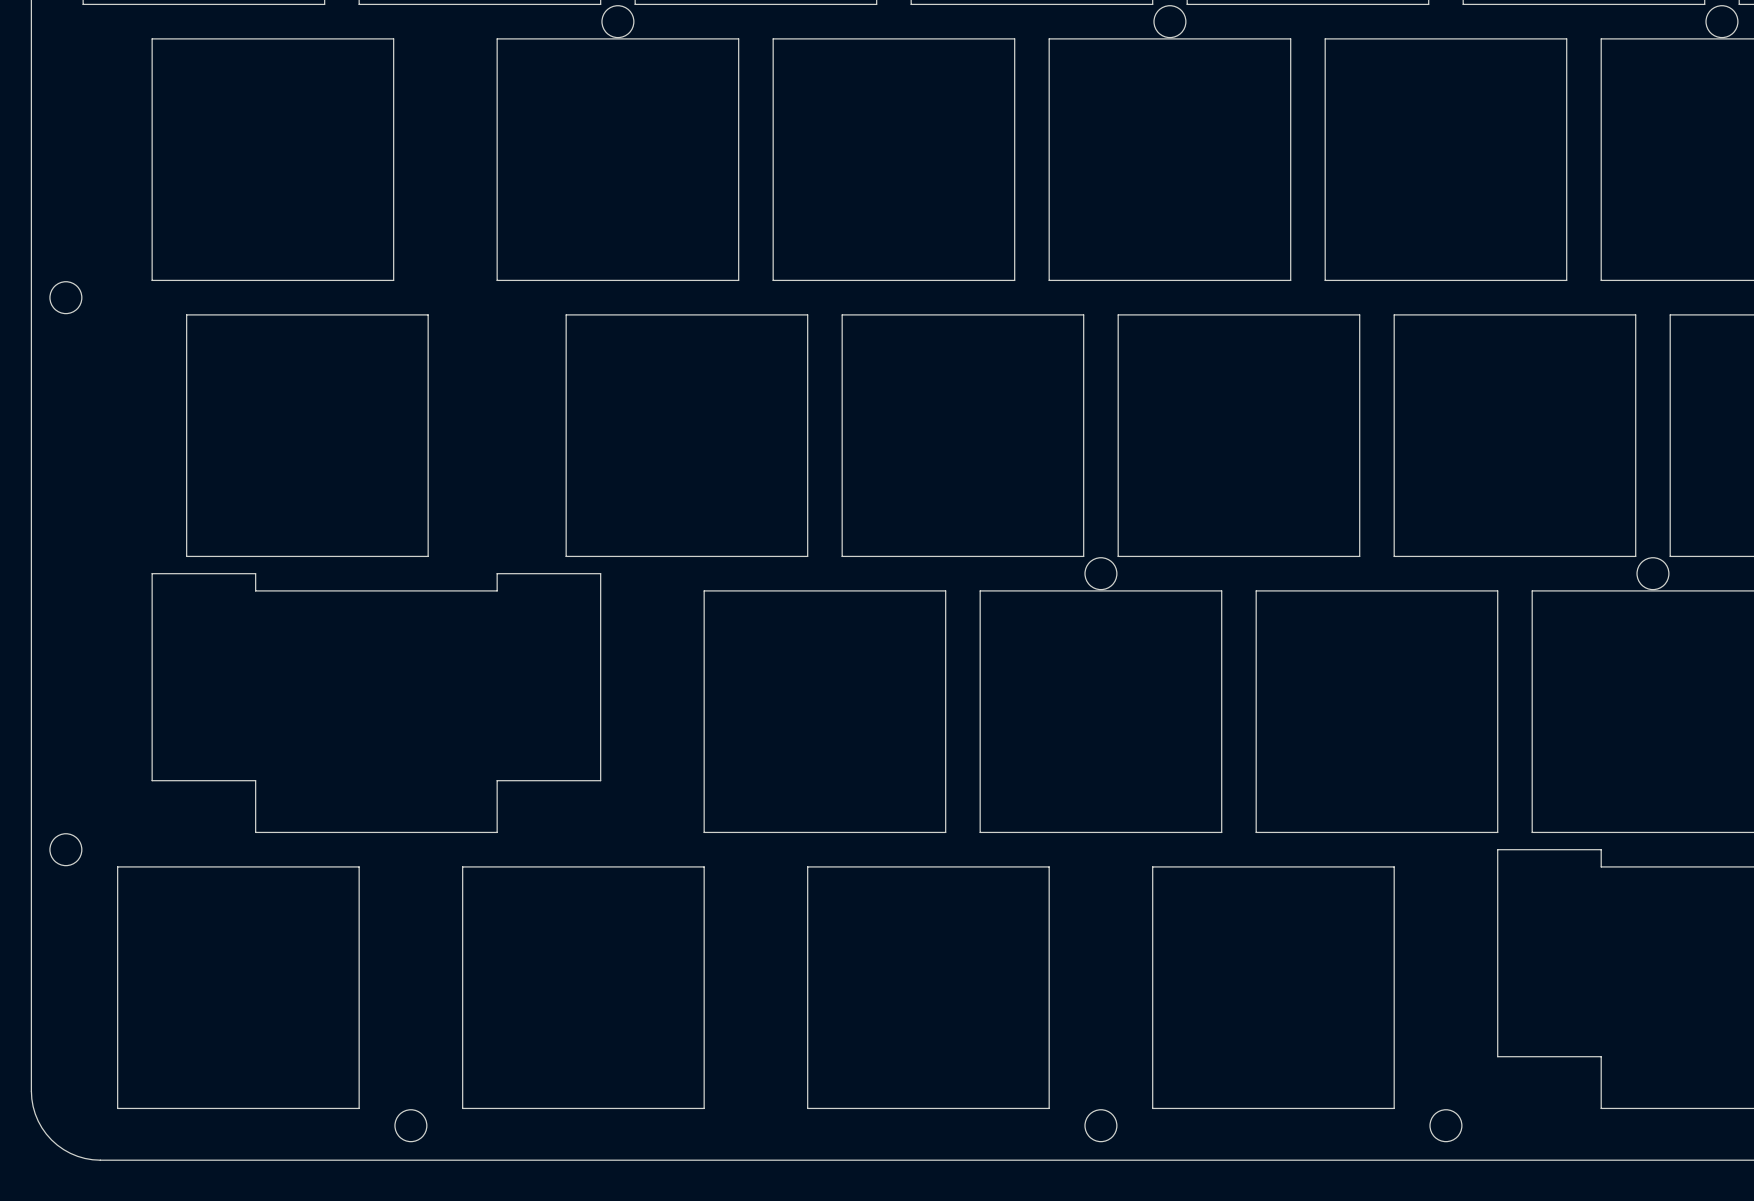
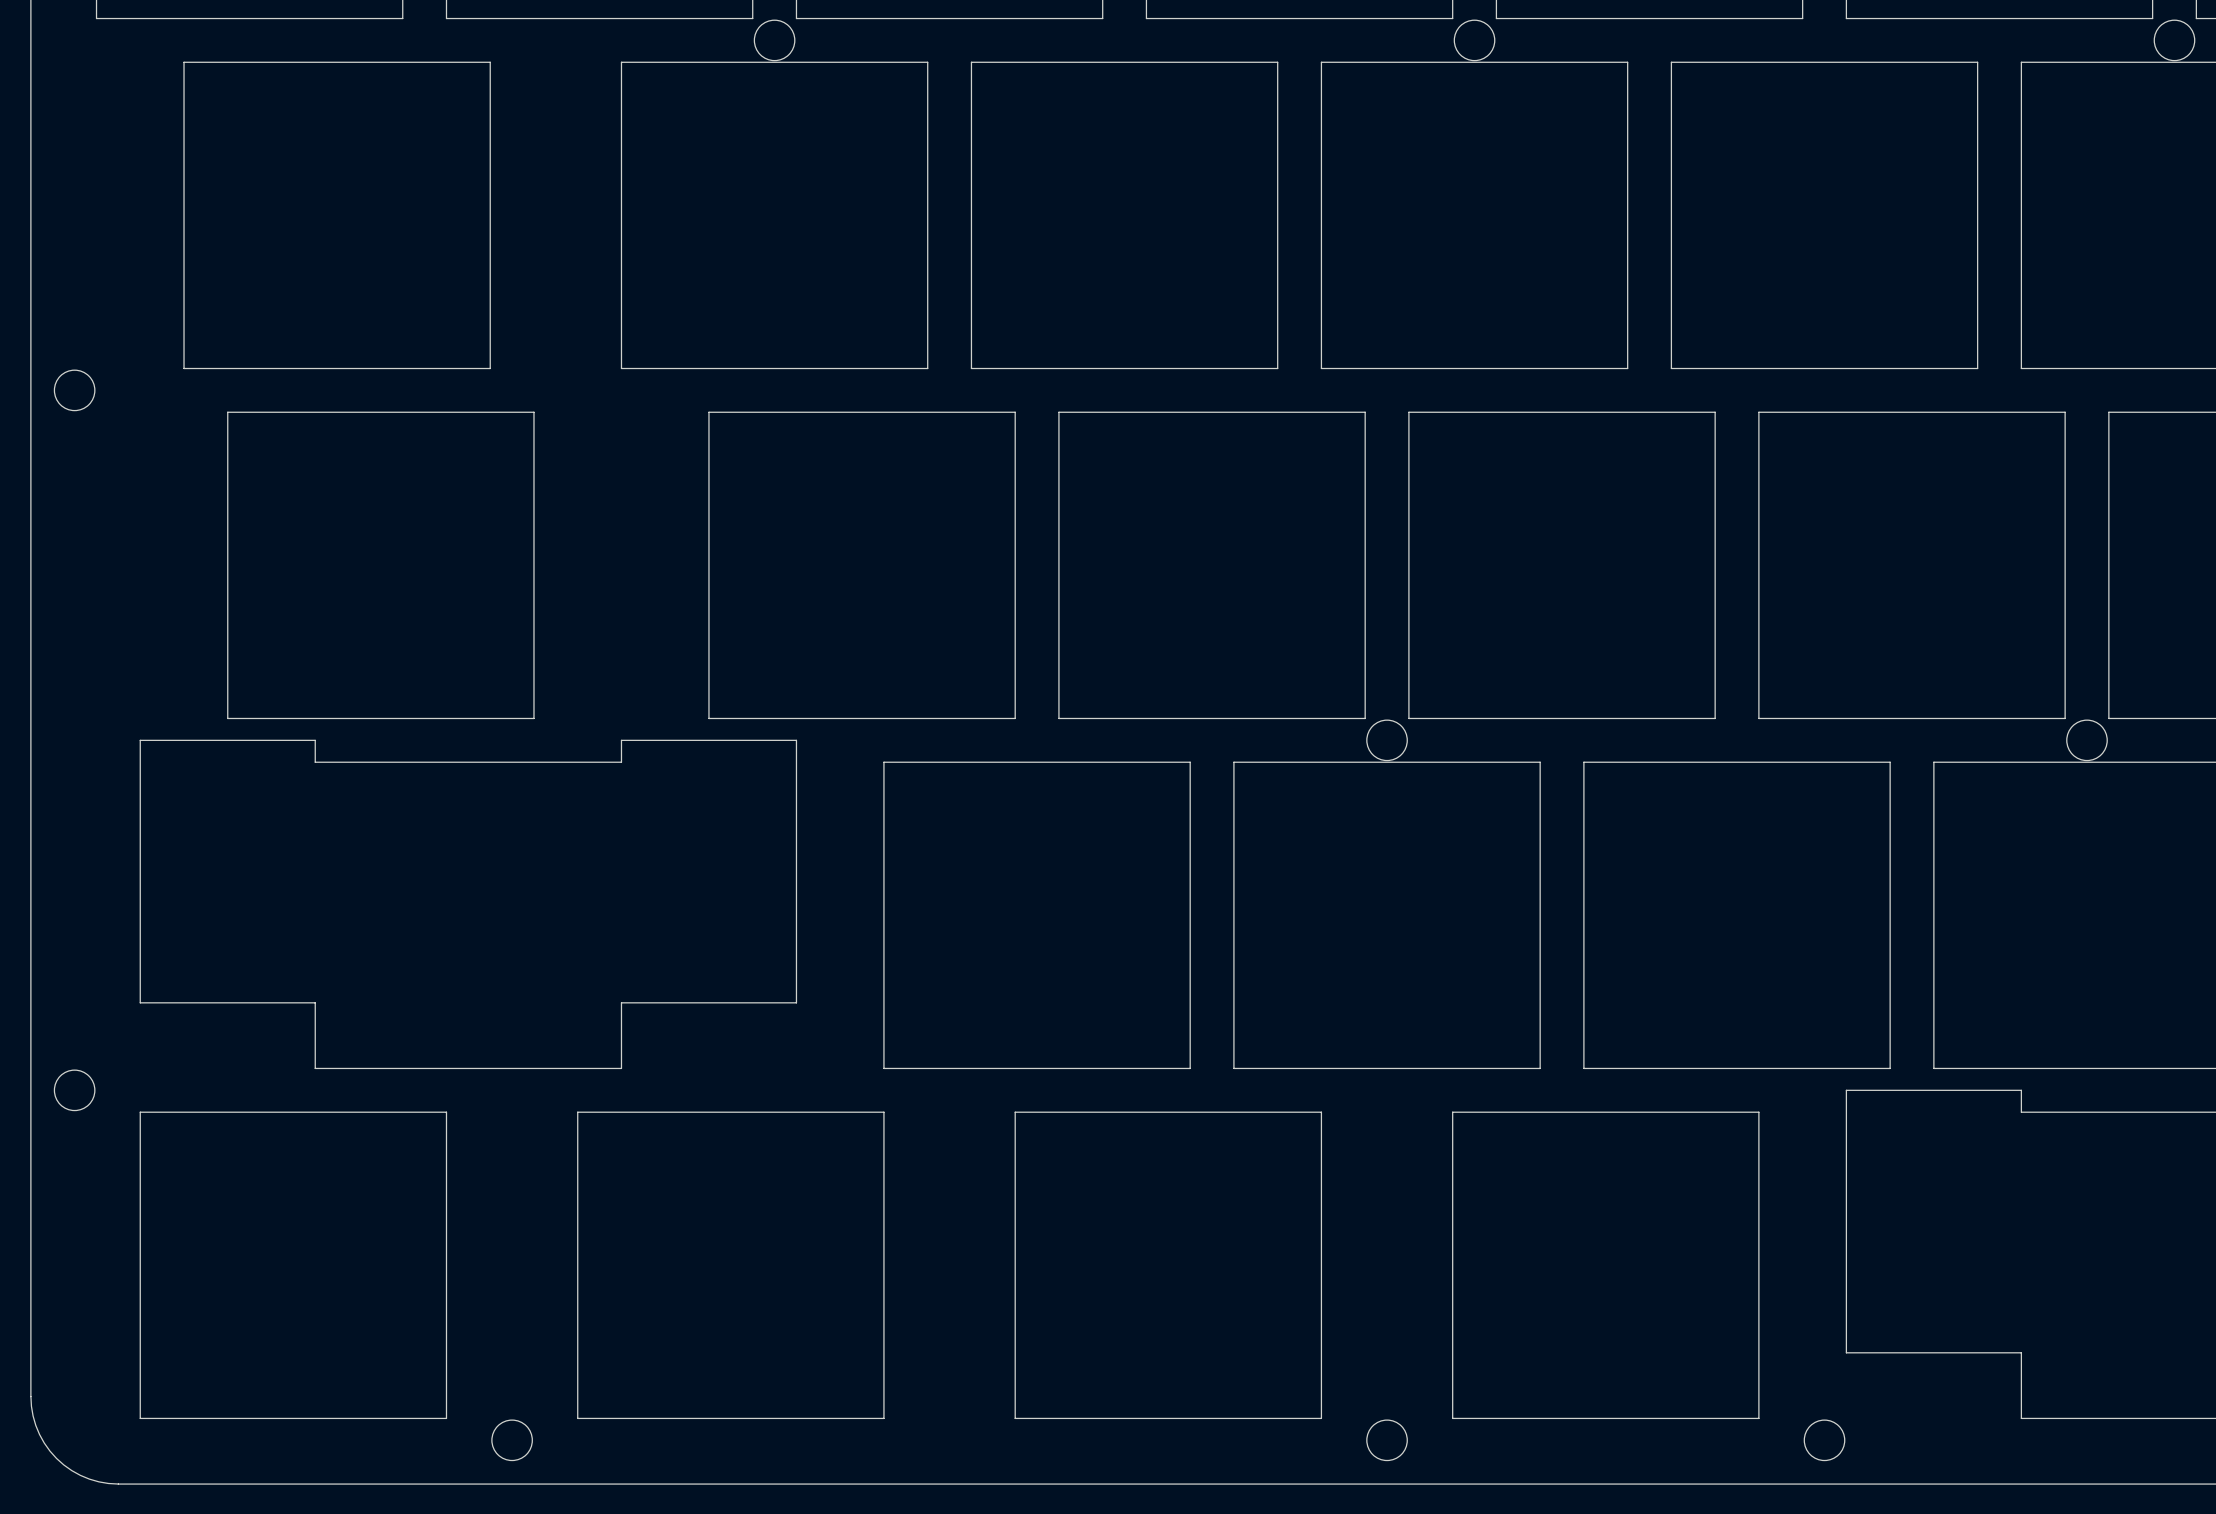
board edge: (152, 573) (152, 780) -> (184, 740) (140, 740) (140, 1002) (184, 1002)
board edge: (600, 573) (600, 780) -> (752, 740) (796, 740) (796, 1002) (752, 1002)
board edge: (1497, 849) (1497, 1056) -> (1890, 1090) (1846, 1090) (1846, 1352) (1890, 1352)

